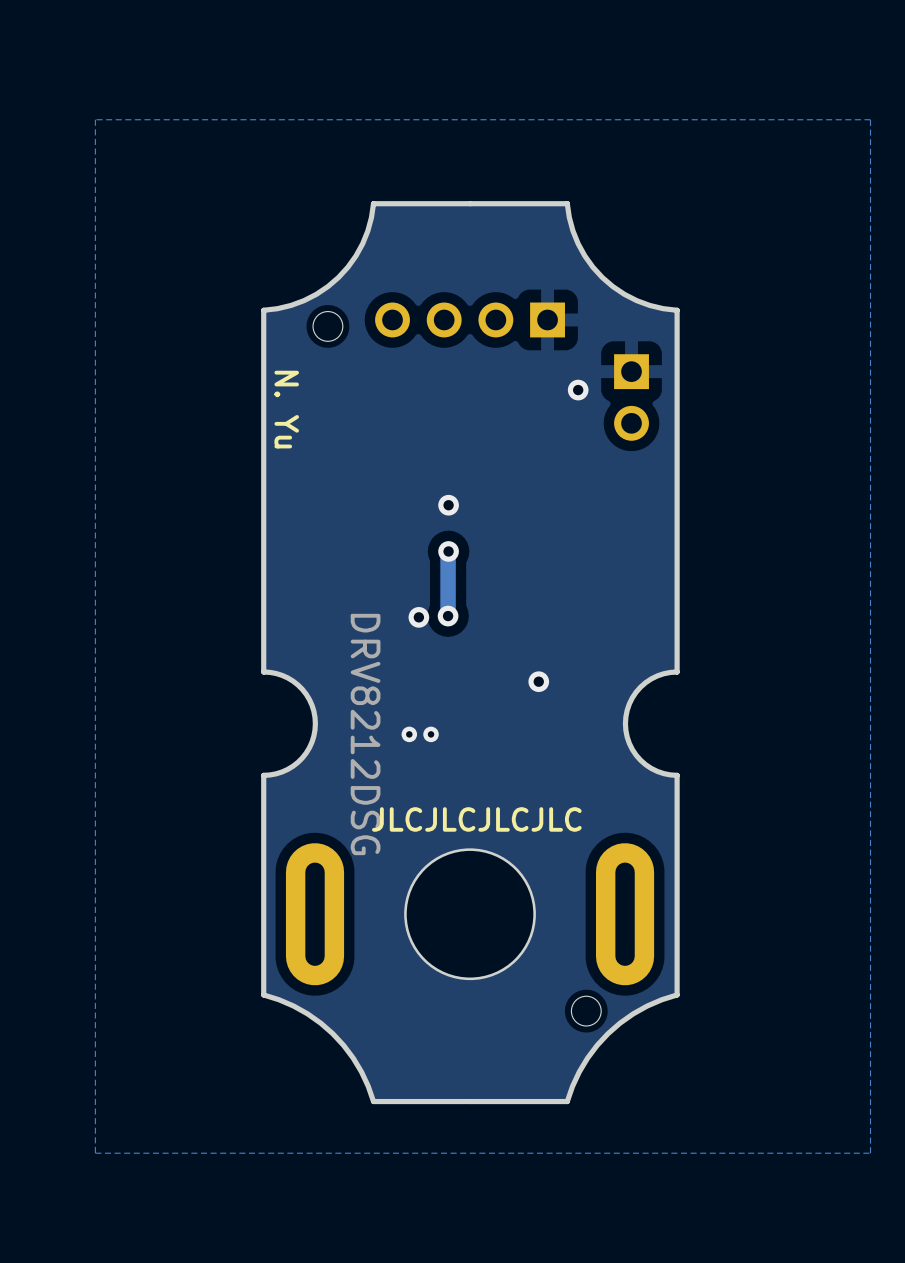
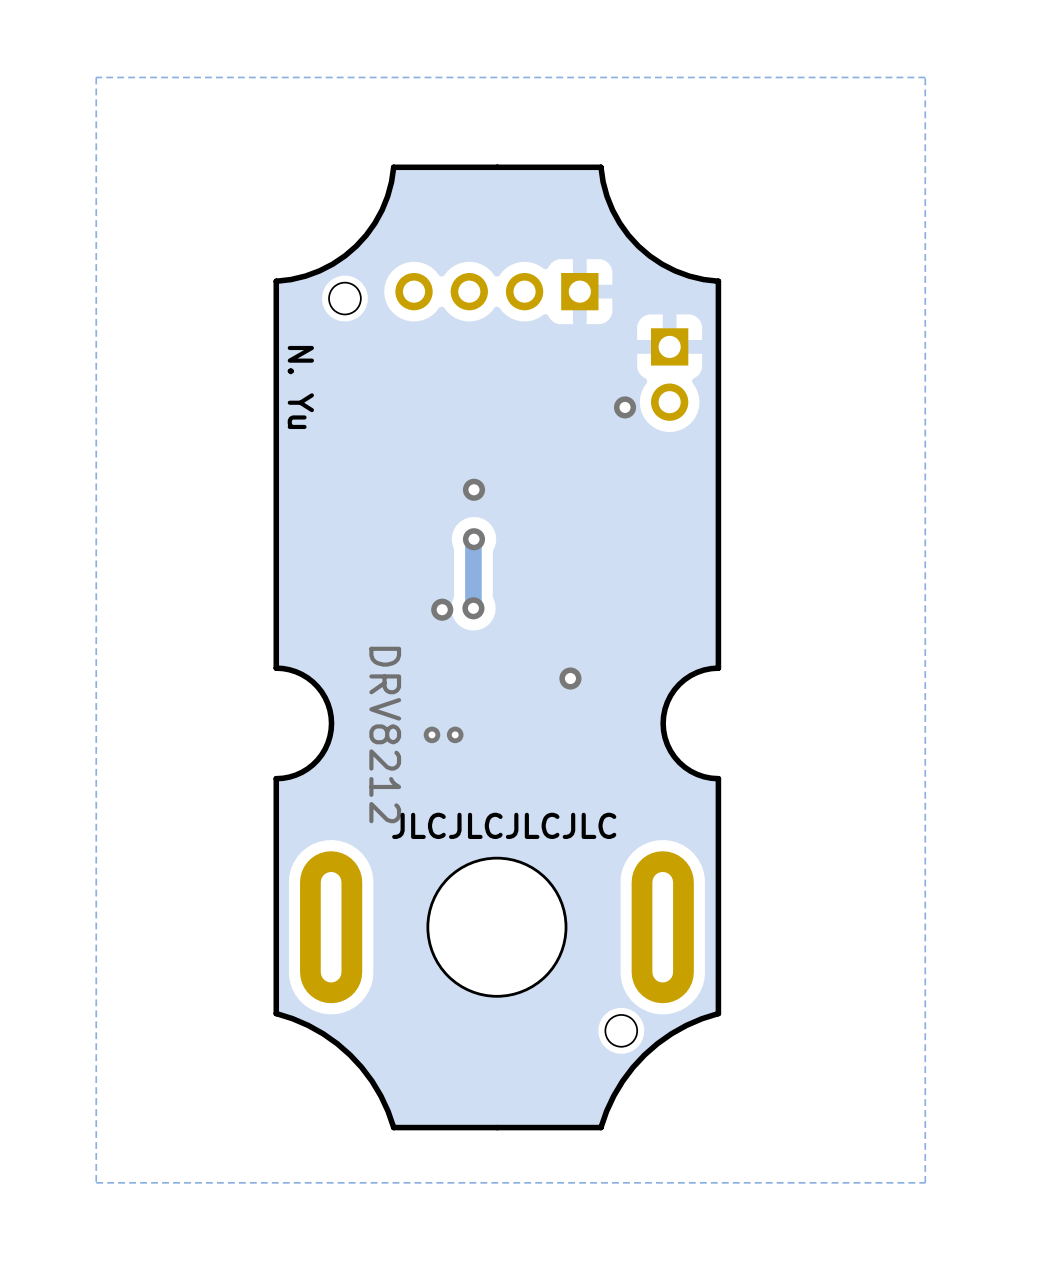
via position: (578, 390) -> (625, 407)
part value: DRV8212DSG (365, 734) -> DRV8212 (385, 734)

